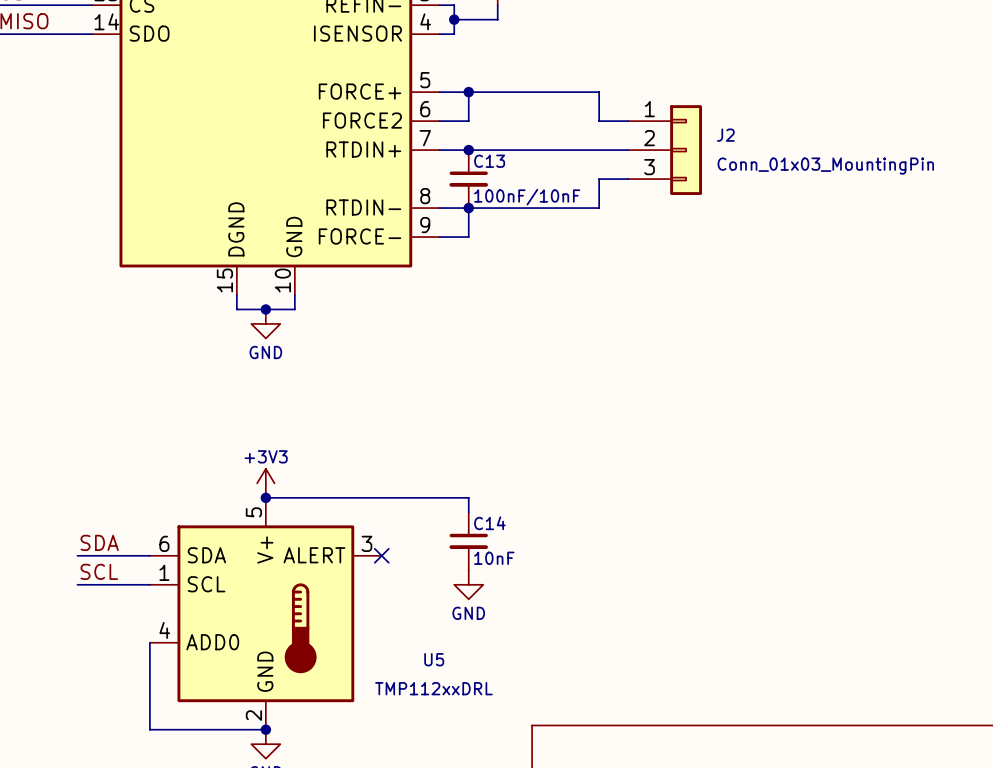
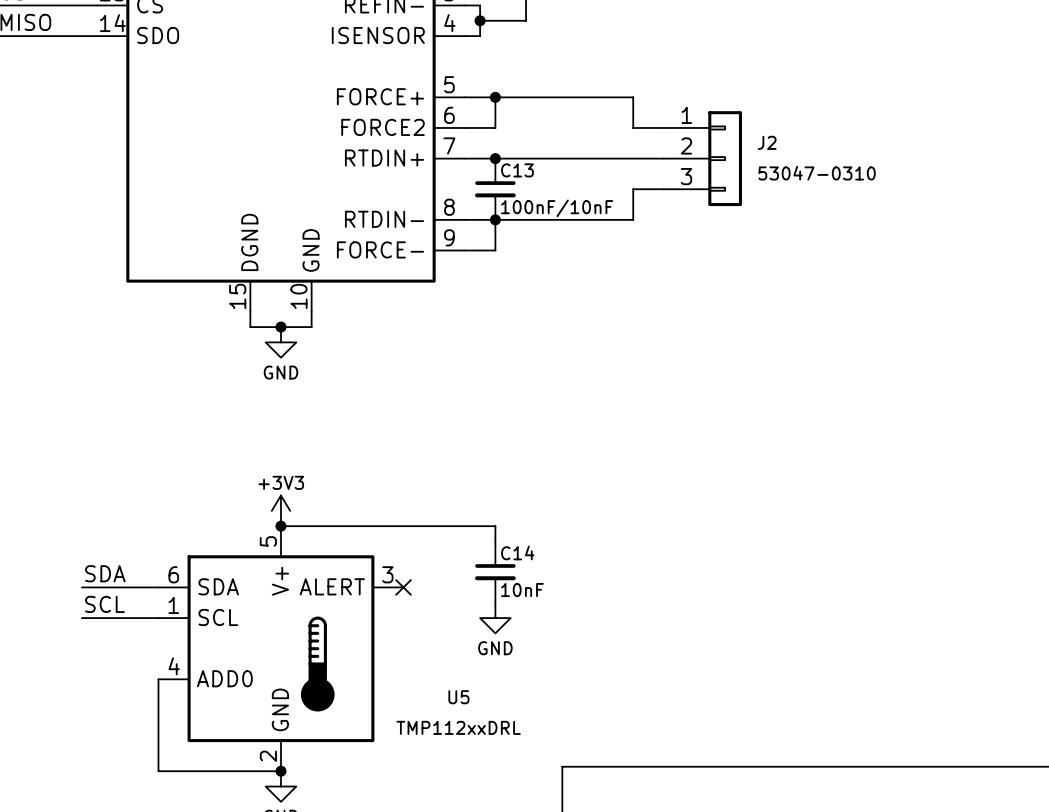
J2 value: Conn_01x03_MountingPin (825, 166) -> 53047-0310 (817, 173)

